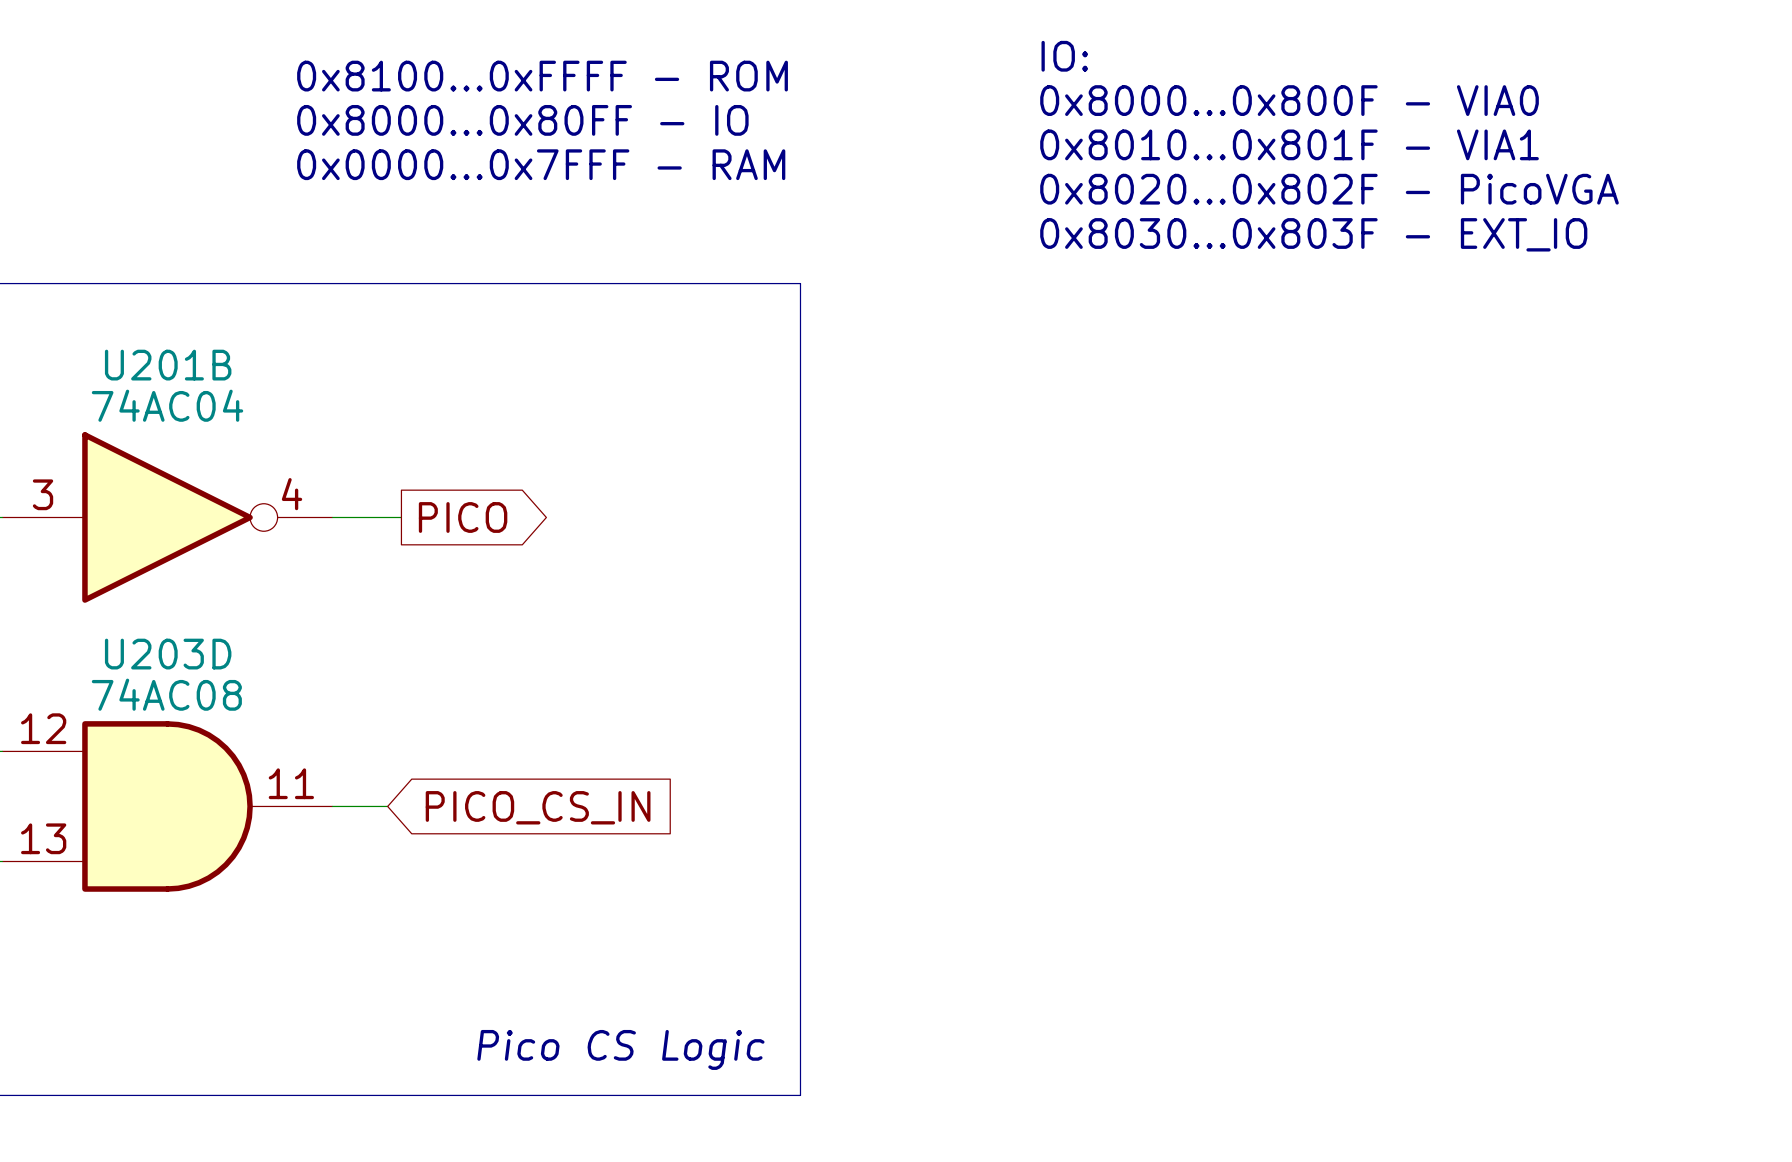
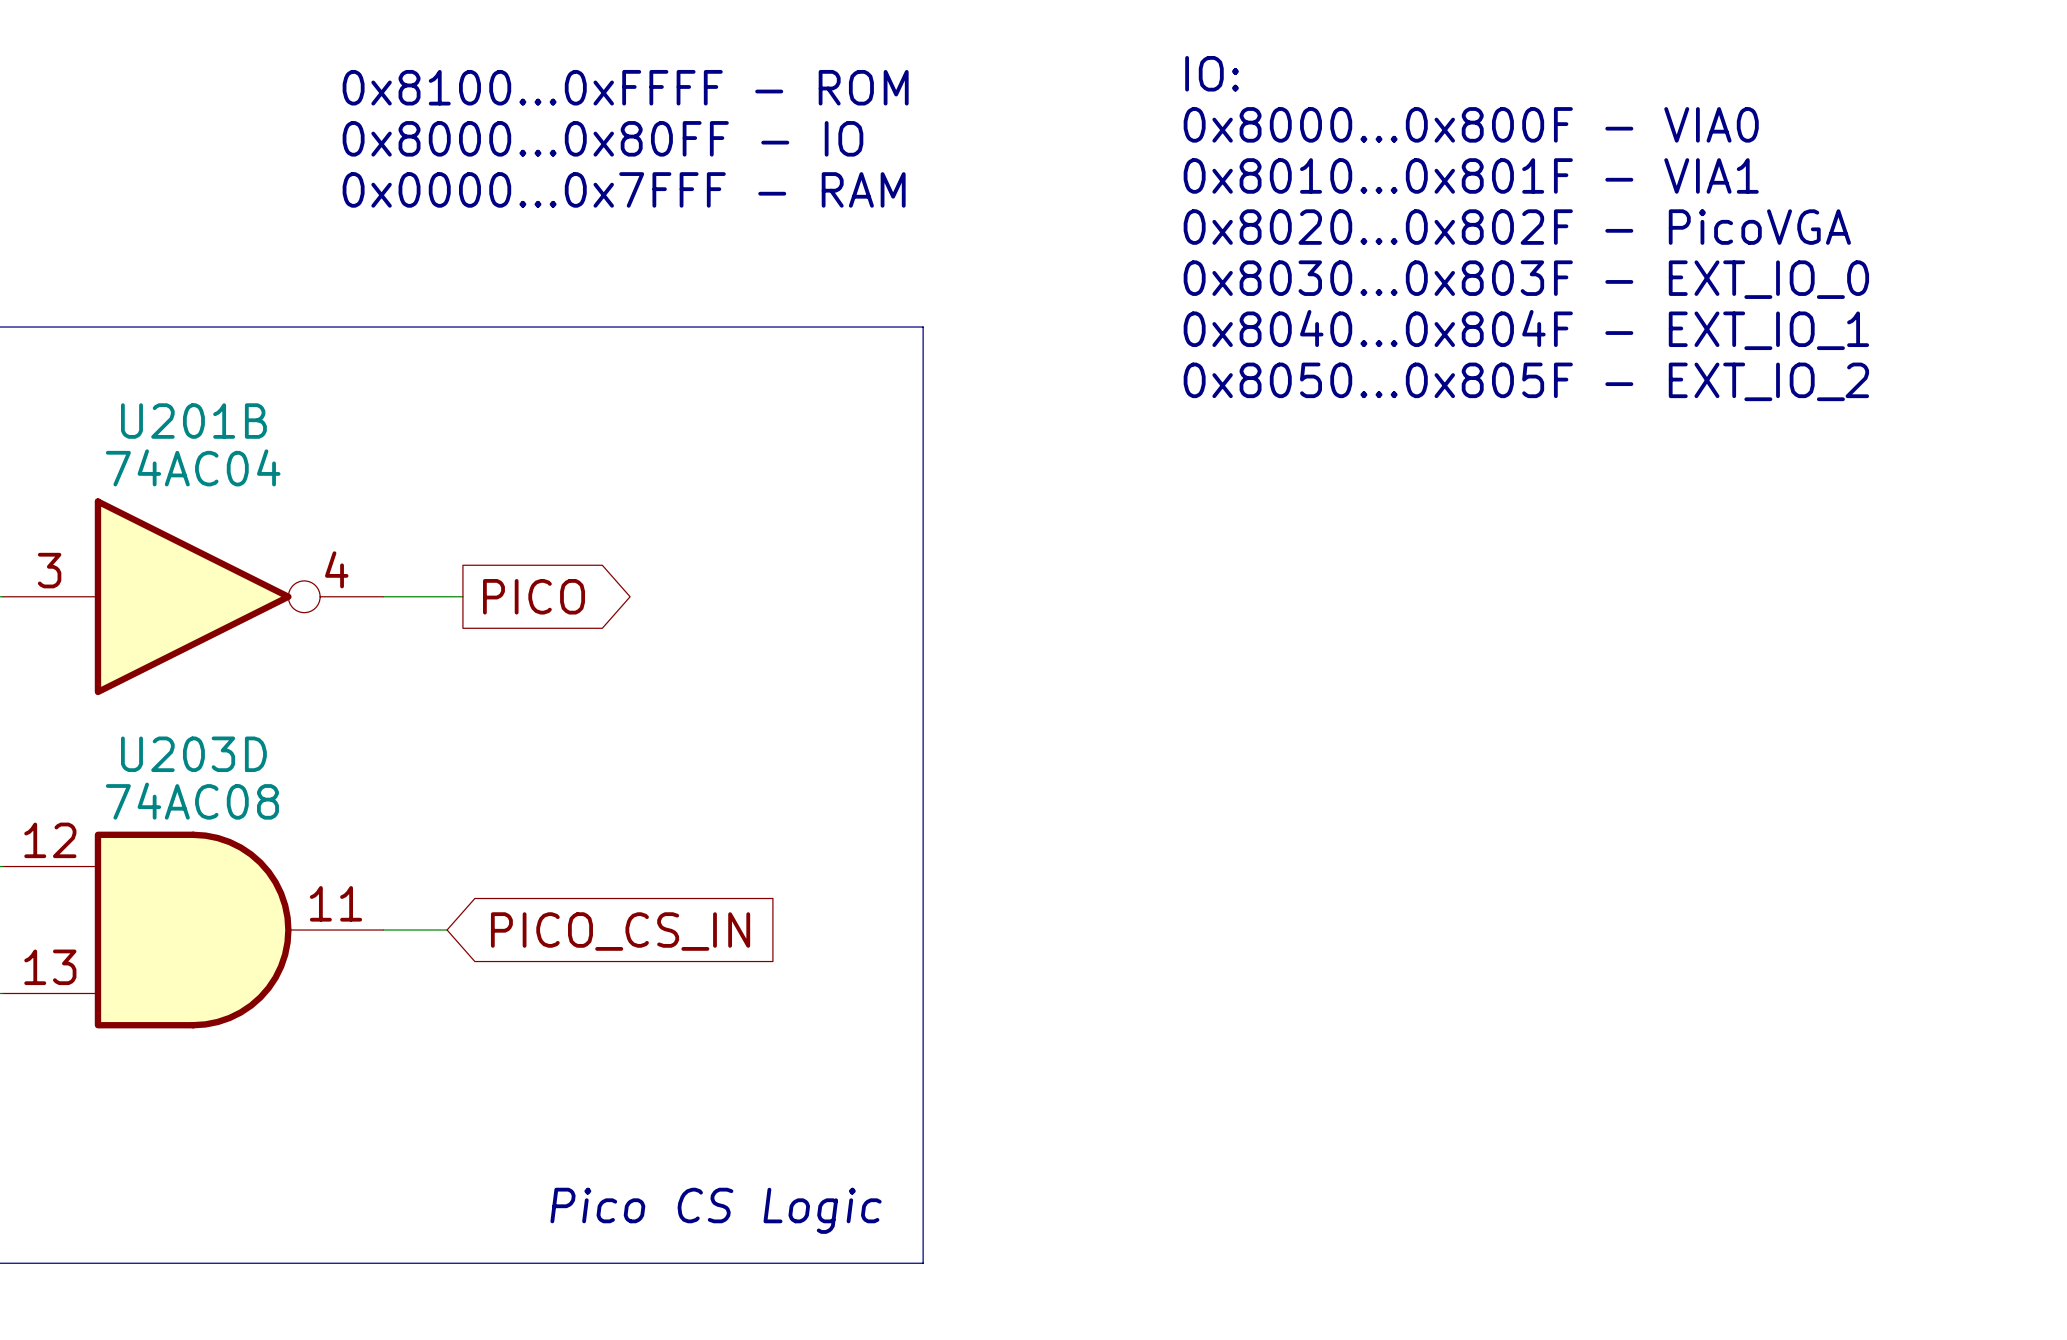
text position: IO: (1064, 56) -> IO: (1212, 73)
text position: 0x8000...0x800F - VIA0 (1289, 100) -> 0x8000...0x800F - VIA0 (1471, 124)
text position: 0x8010...0x801F - VIA1 (1289, 144) -> 0x8010...0x801F - VIA1 (1471, 175)
text position: 0x8020...0x802F - PicoVGA (1329, 189) -> 0x8020...0x802F - PicoVGA (1517, 227)
text: 0x8030...0x803F - EXT_IO (1313, 234) -> 0x8030...0x803F - EXT_IO_0 (1526, 279)
text: none -> 0x8040...0x804F - EXT_IO_1 (1526, 330)
text: none -> 0x8050...0x805F - EXT_IO_2 (1526, 381)

